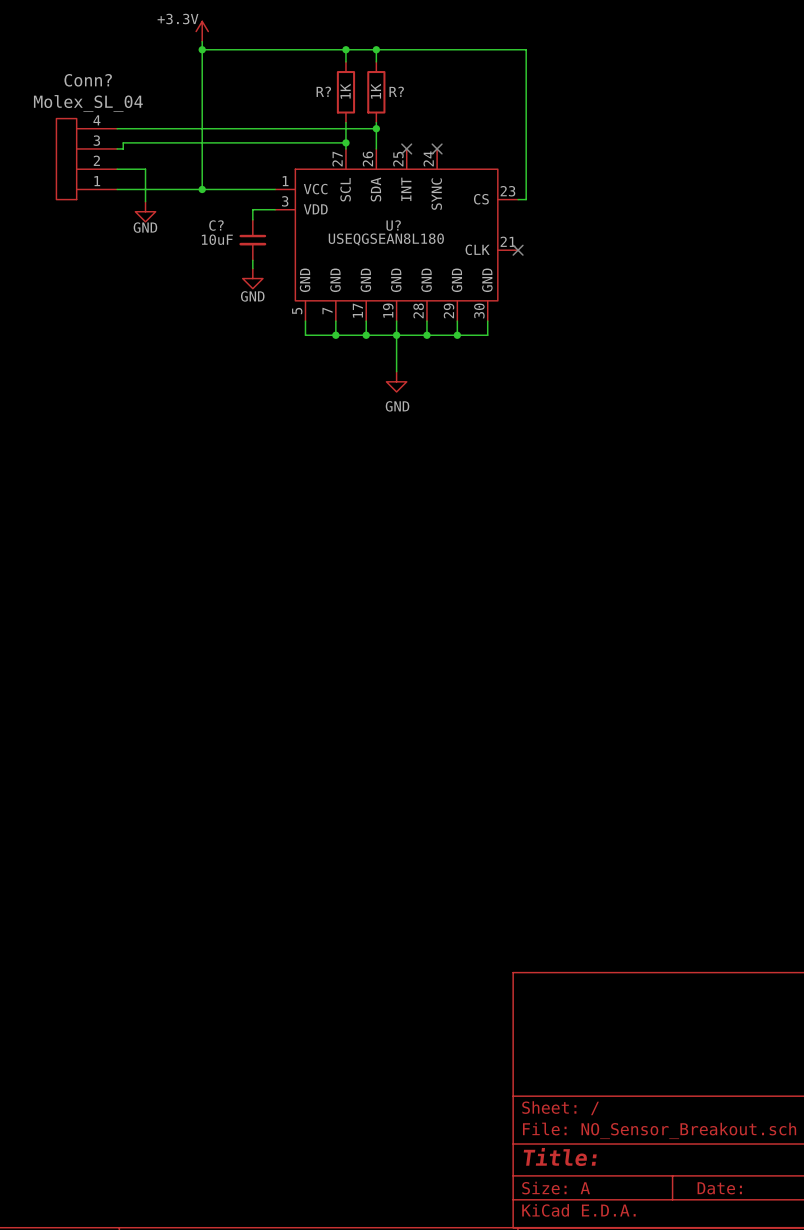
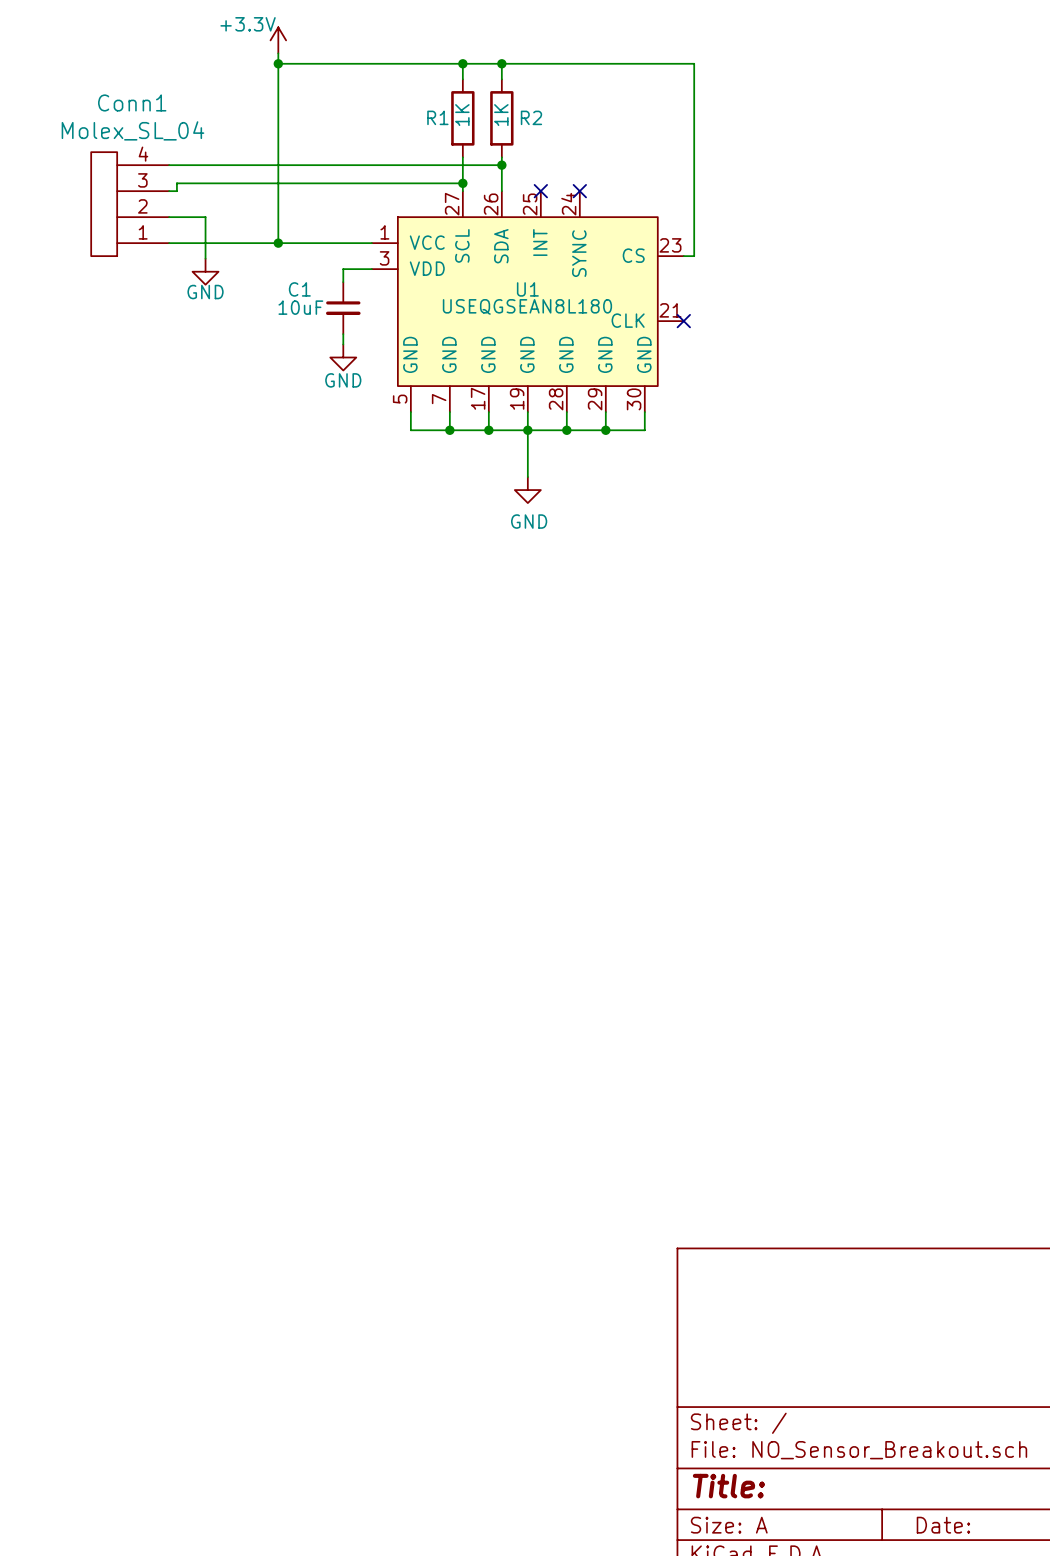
Conn? name: Conn? (88, 80) -> Conn1 (132, 102)
R? name: R? (323, 91) -> R1 (437, 117)
R? name: R? (396, 91) -> R2 (531, 117)
C? name: C? (216, 225) -> C1 (299, 289)
U? name: U? (393, 225) -> U1 (527, 289)

